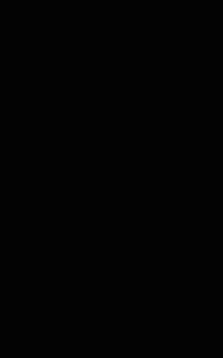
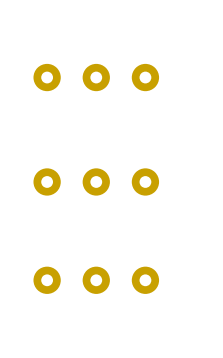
part: none -> (96, 77)
part: none -> (96, 181)
part: none -> (96, 280)

